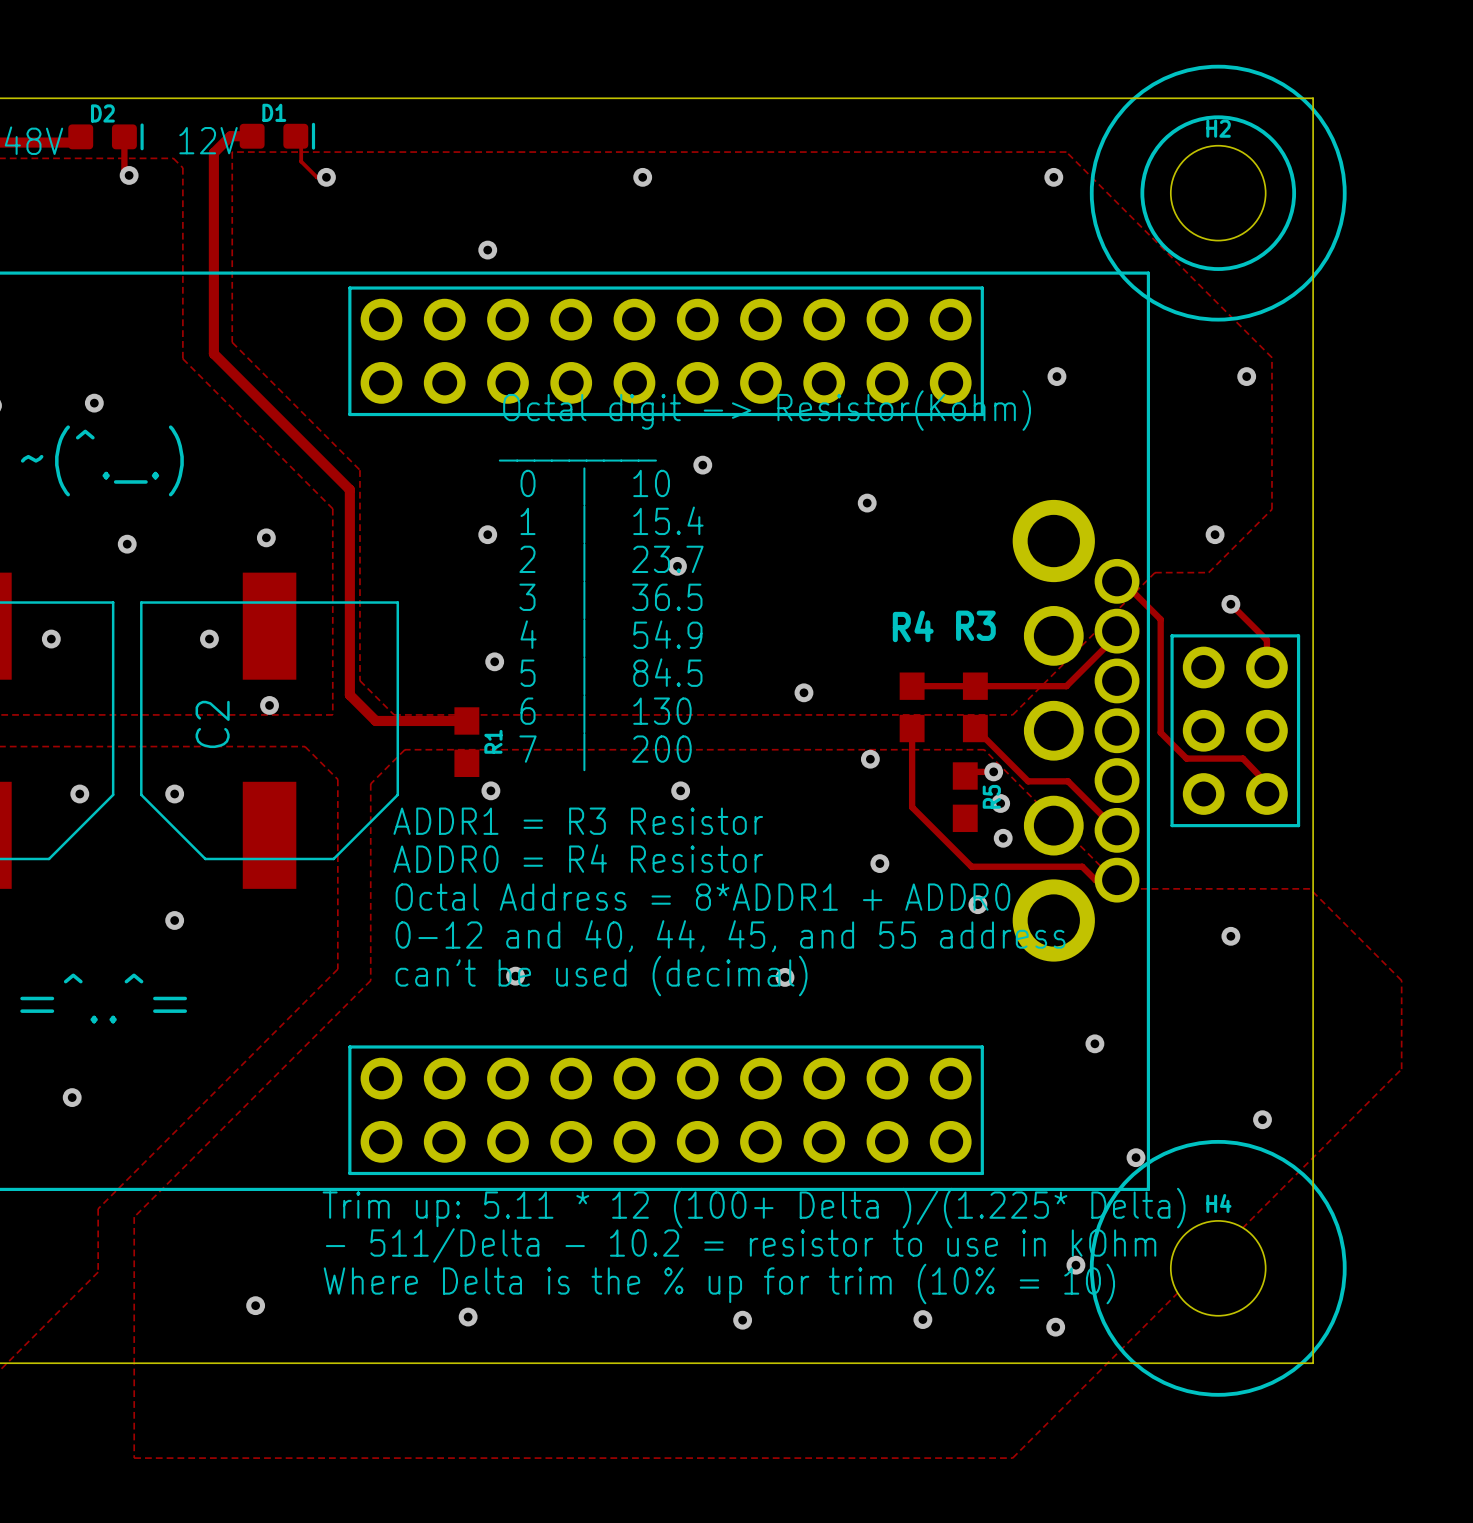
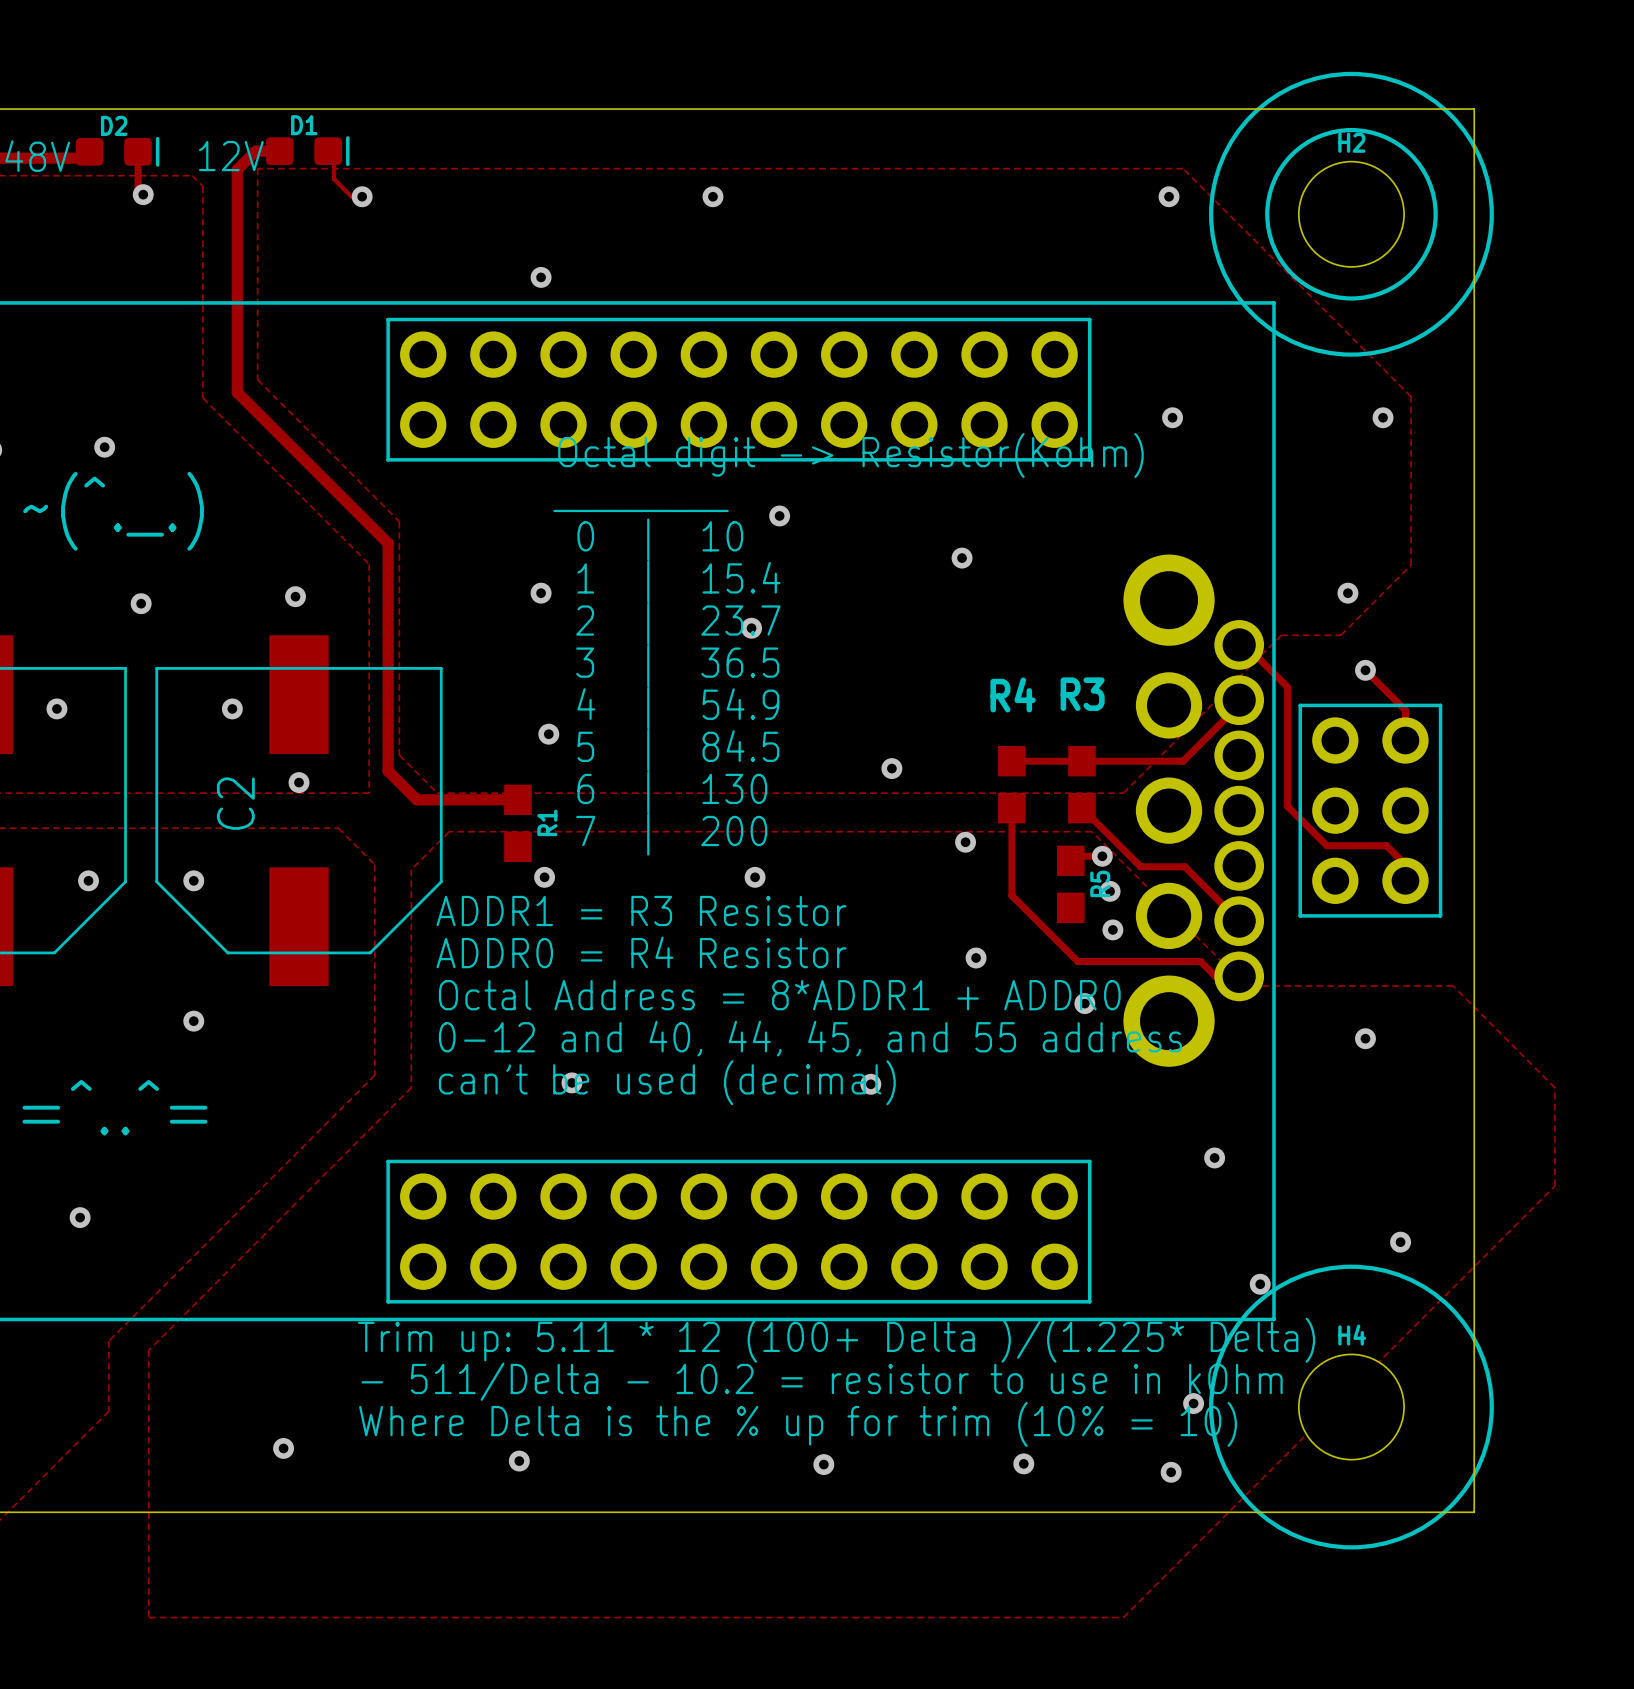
board edge: (1313, 98) (1313, 1363) -> (1456, 109) (1474, 109) (1474, 1512) (1456, 1512)
track: (1160, 726) (1160, 732) (1186, 758) (1243, 758) (1266, 783) (1266, 794) -> (1287, 806) (1326, 845) (1386, 845) (1421, 880)

